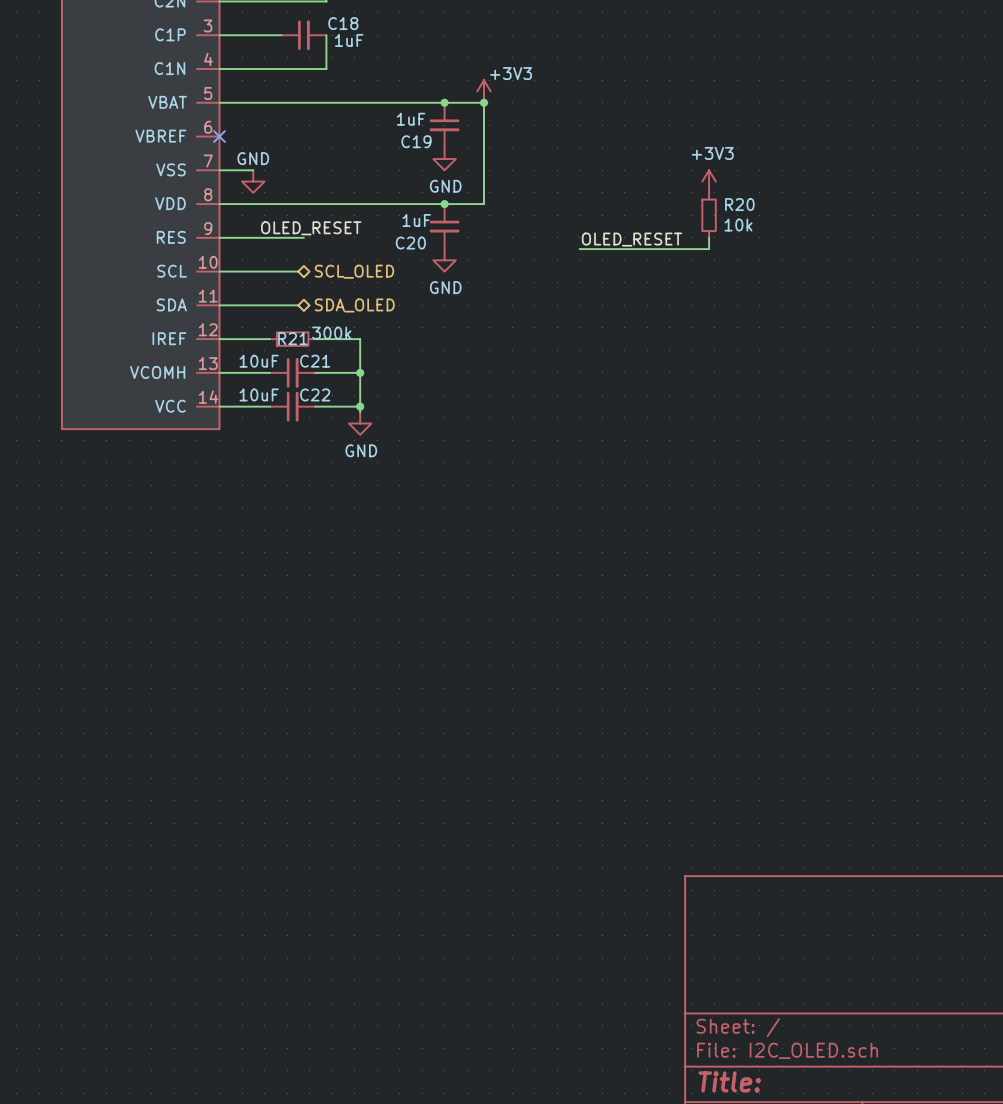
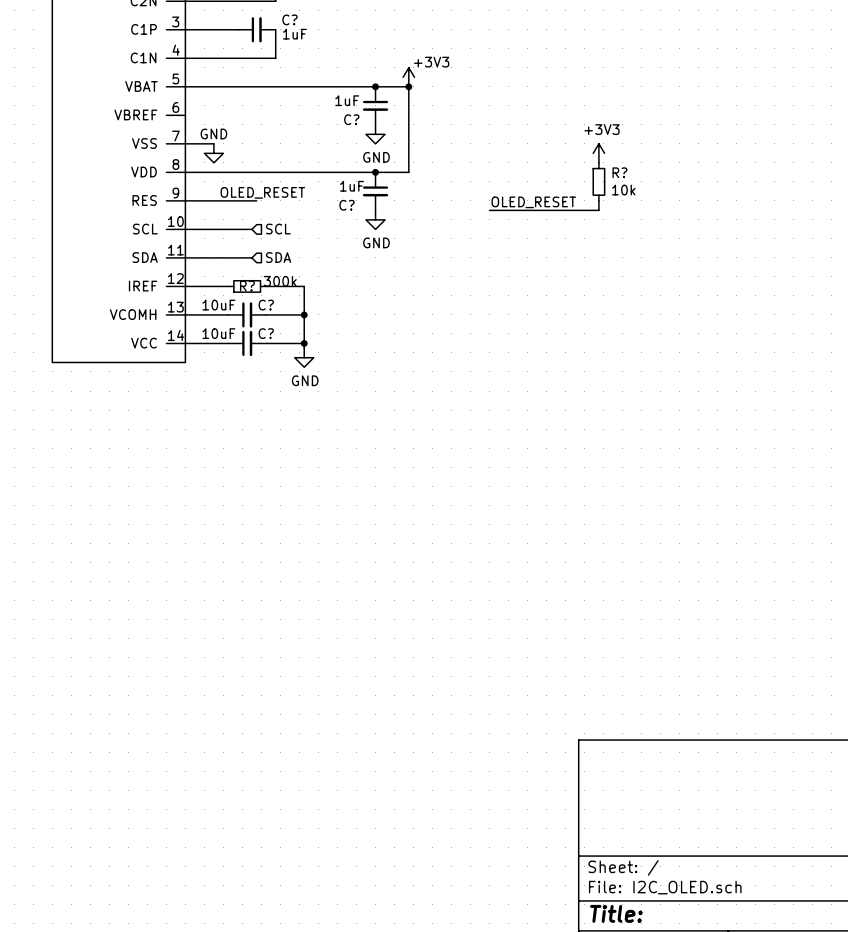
C18 name: C18 (343, 23) -> C? (289, 19)
no-connect mark: (219, 136) -> none
C19 name: C19 (416, 141) -> C? (351, 119)
R20 name: R20 (739, 204) -> R? (619, 172)
C20 name: C20 (410, 243) -> C? (347, 205)
hierarchical label shape: bidirectional (354, 271) -> input (278, 229)
hierarchical label: SCL_OLED (354, 271) -> SCL (278, 229)
hierarchical label shape: bidirectional (354, 305) -> input (278, 257)
hierarchical label: SDA_OLED (354, 305) -> SDA (278, 257)
R21 name: R21 (292, 338) -> R? (247, 286)
C21 name: C21 (315, 361) -> C? (266, 305)
C22 name: C22 (315, 394) -> C? (266, 333)

